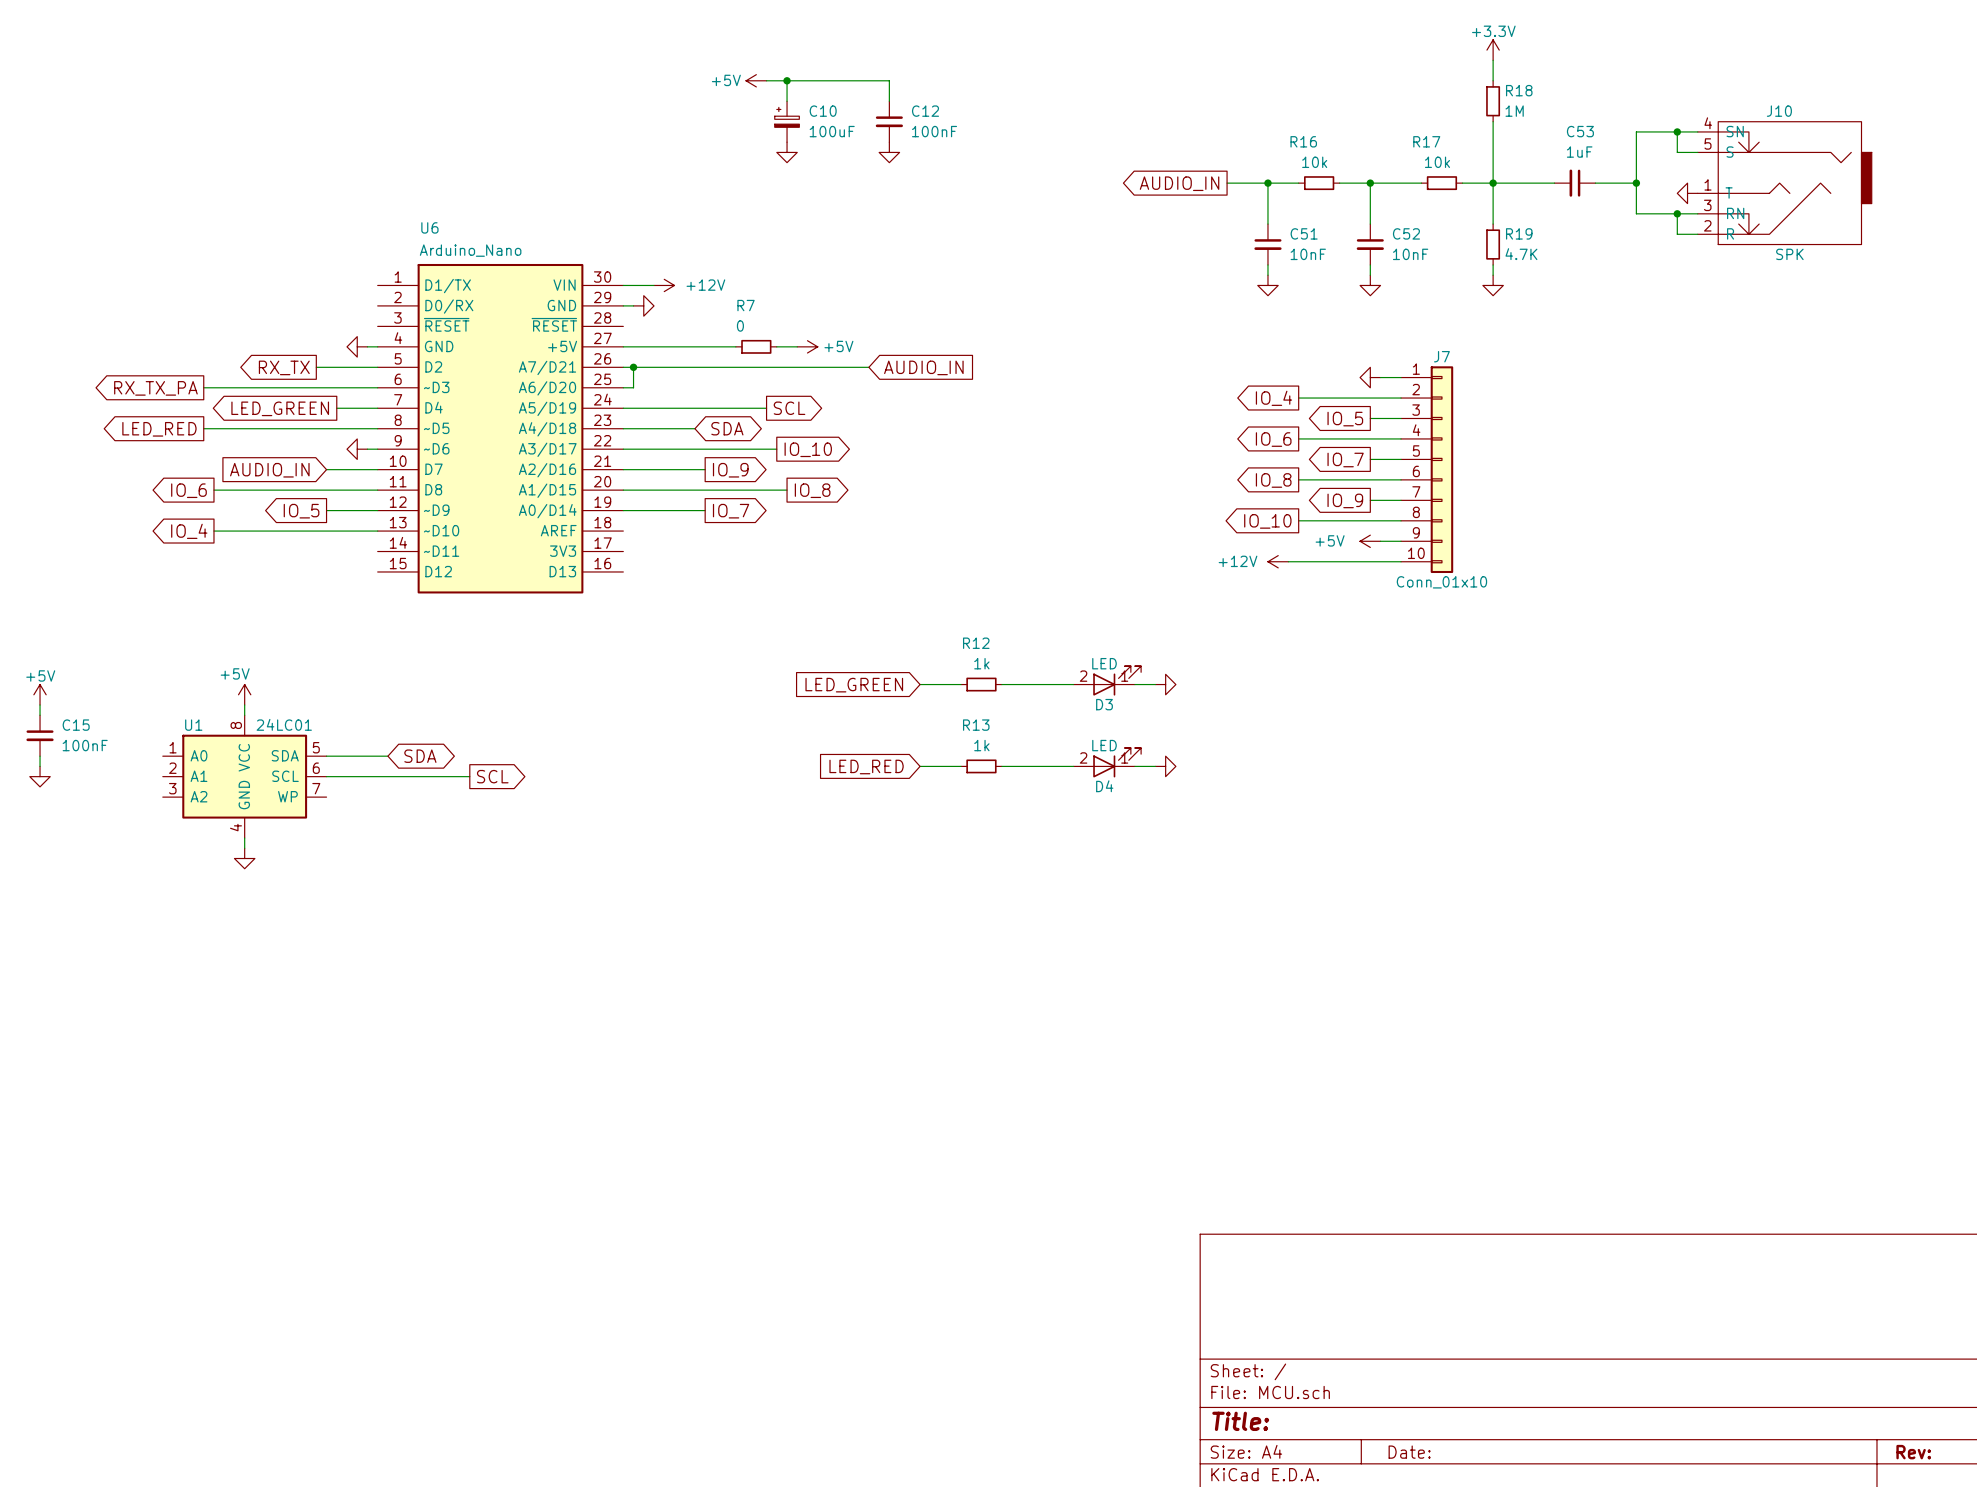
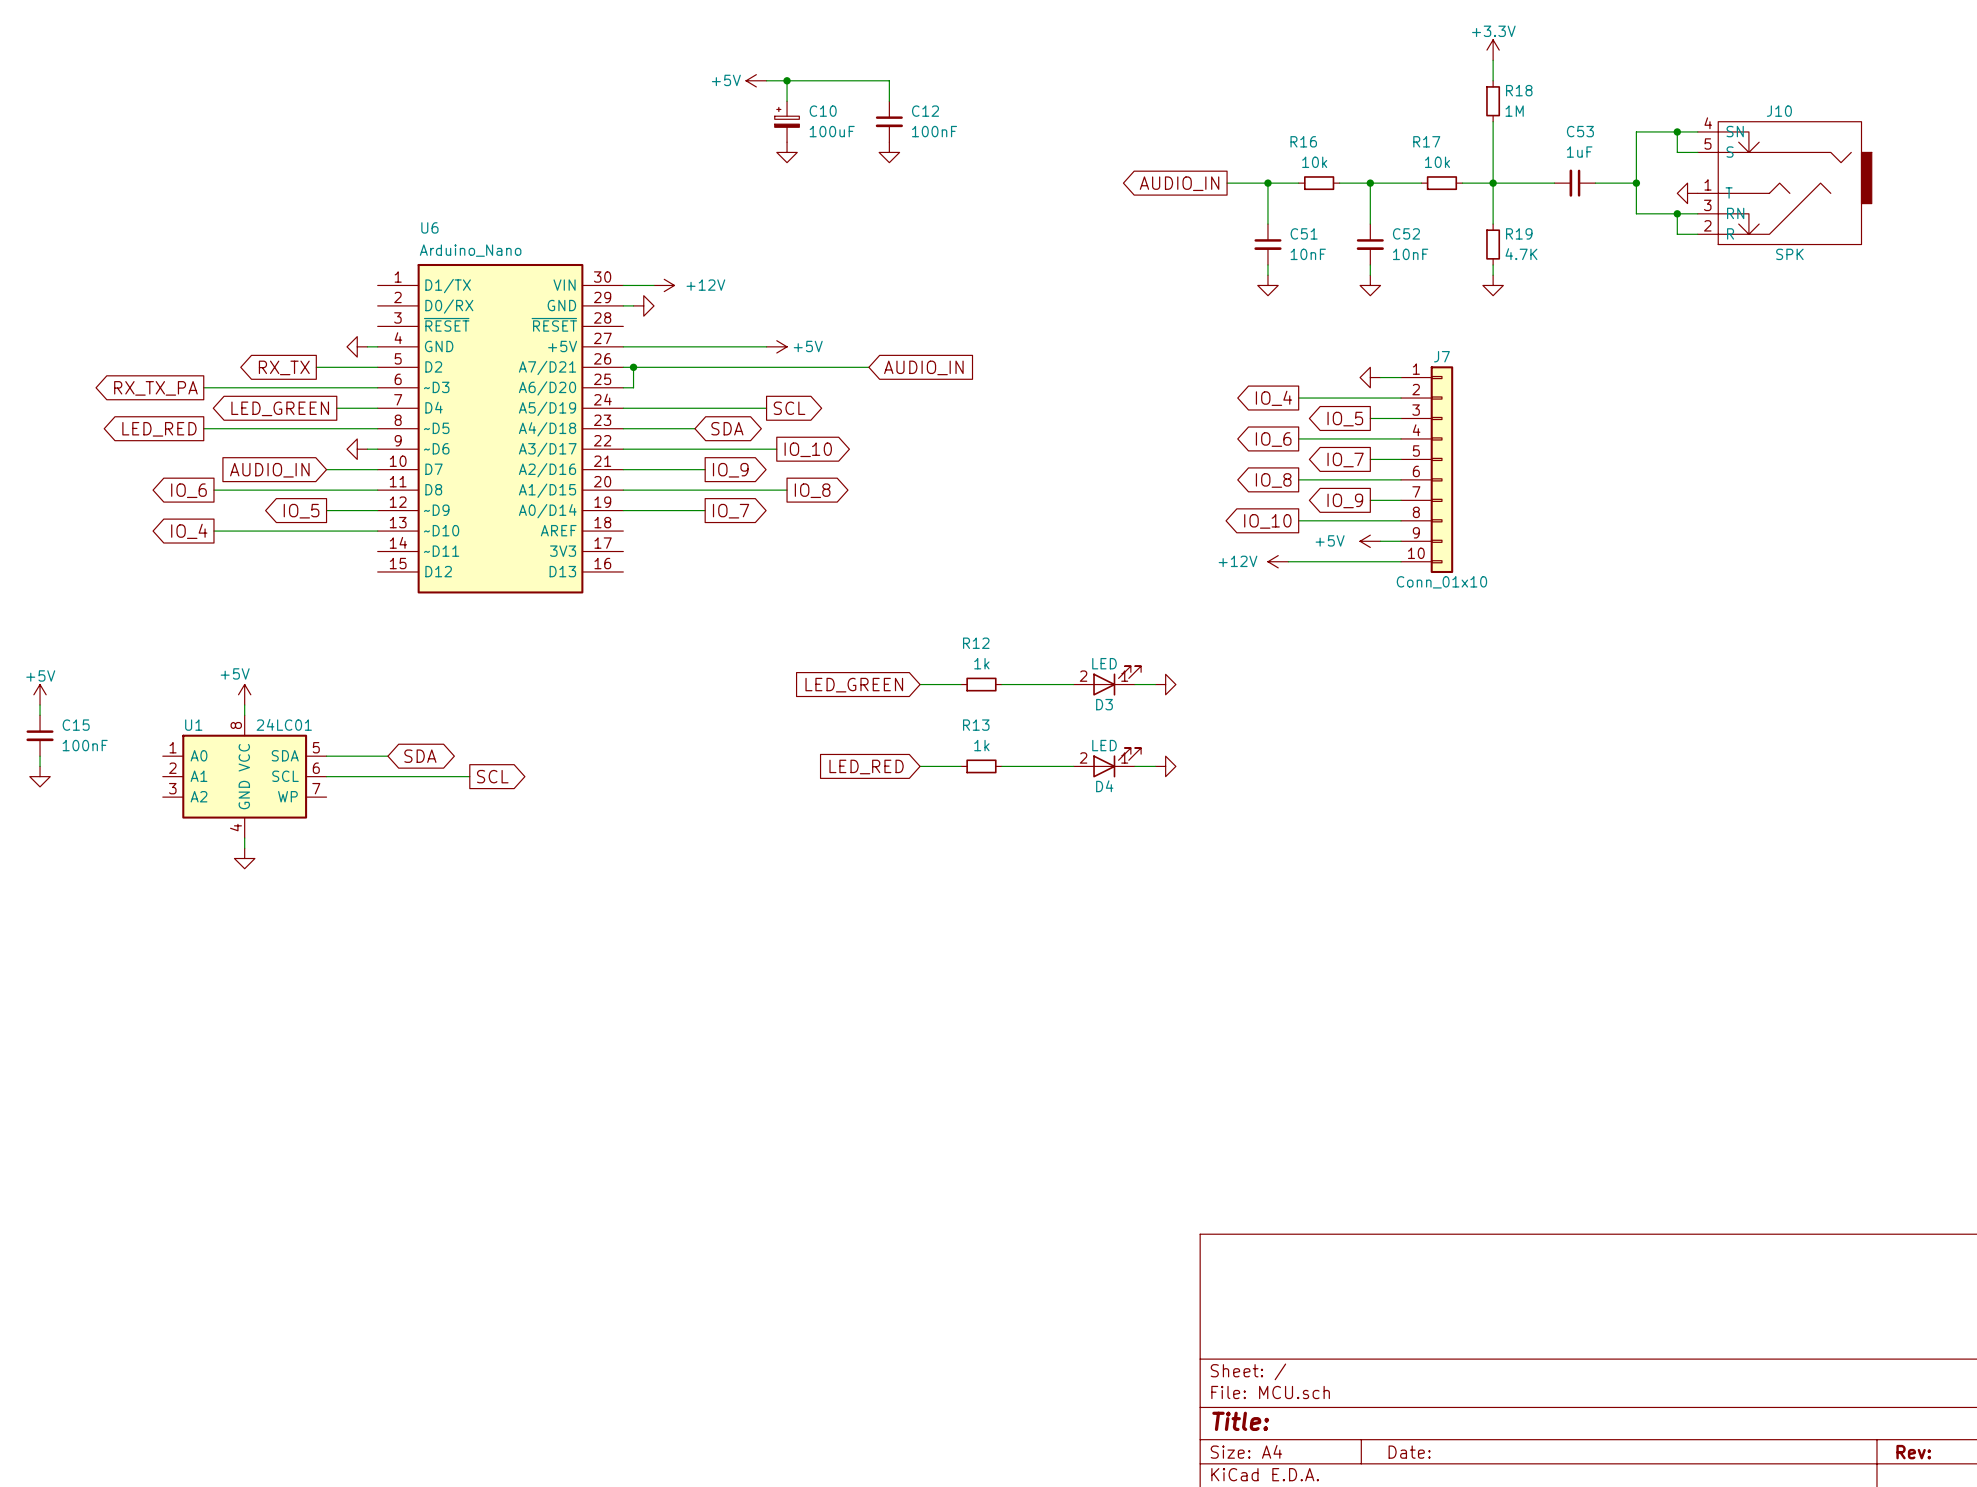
wire: none -> (735, 346) (766, 346)
R7: 0 (756, 346) -> none
power symbol position: +5V (807, 346) -> +5V (776, 346)

